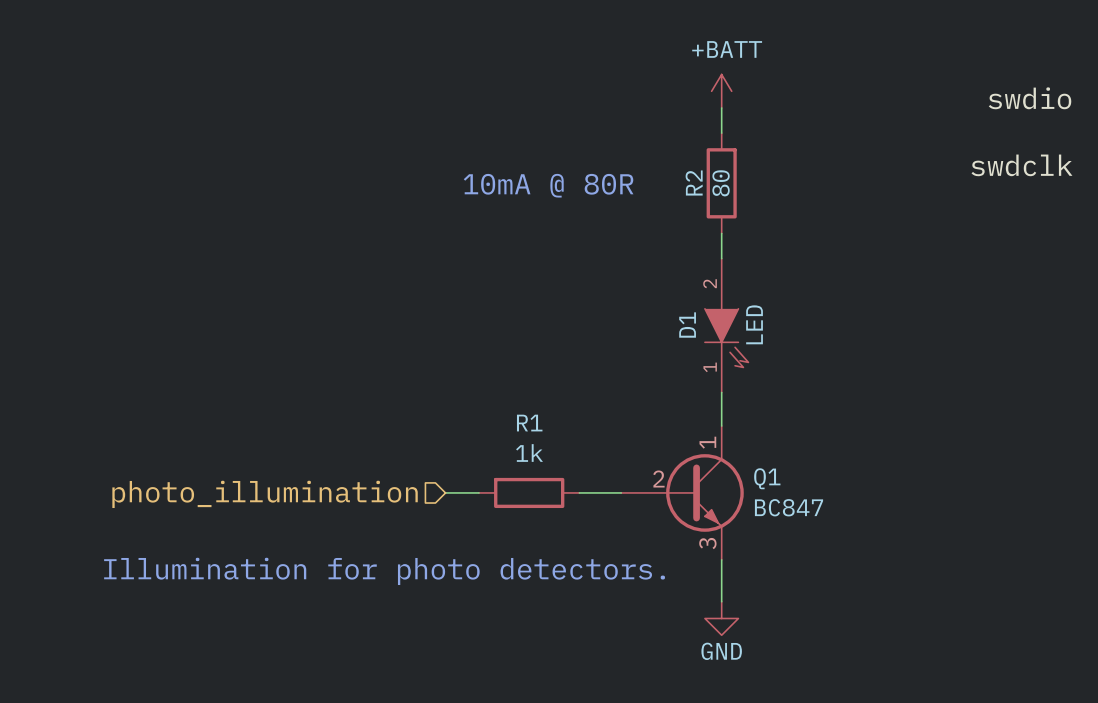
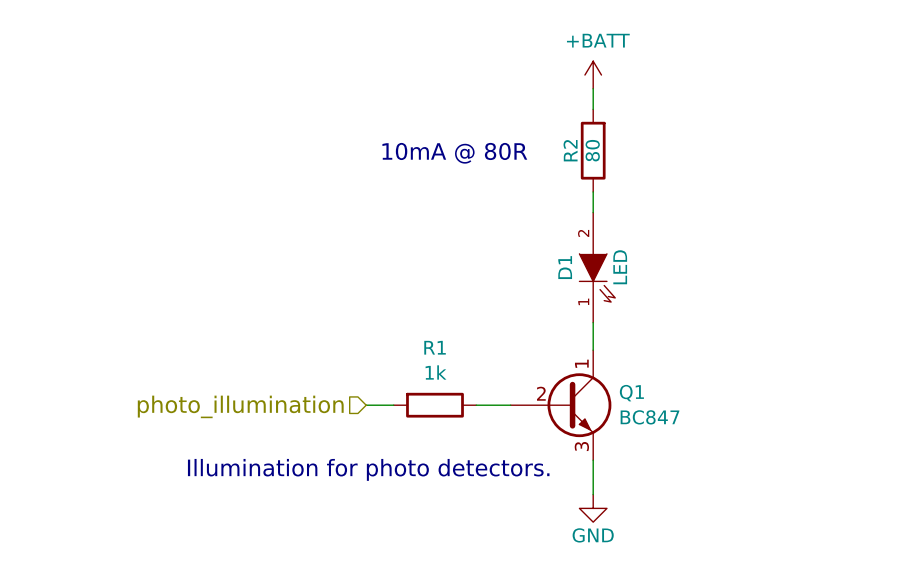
label: swdio (1030, 98) -> none
label: swdclk (1021, 165) -> none

